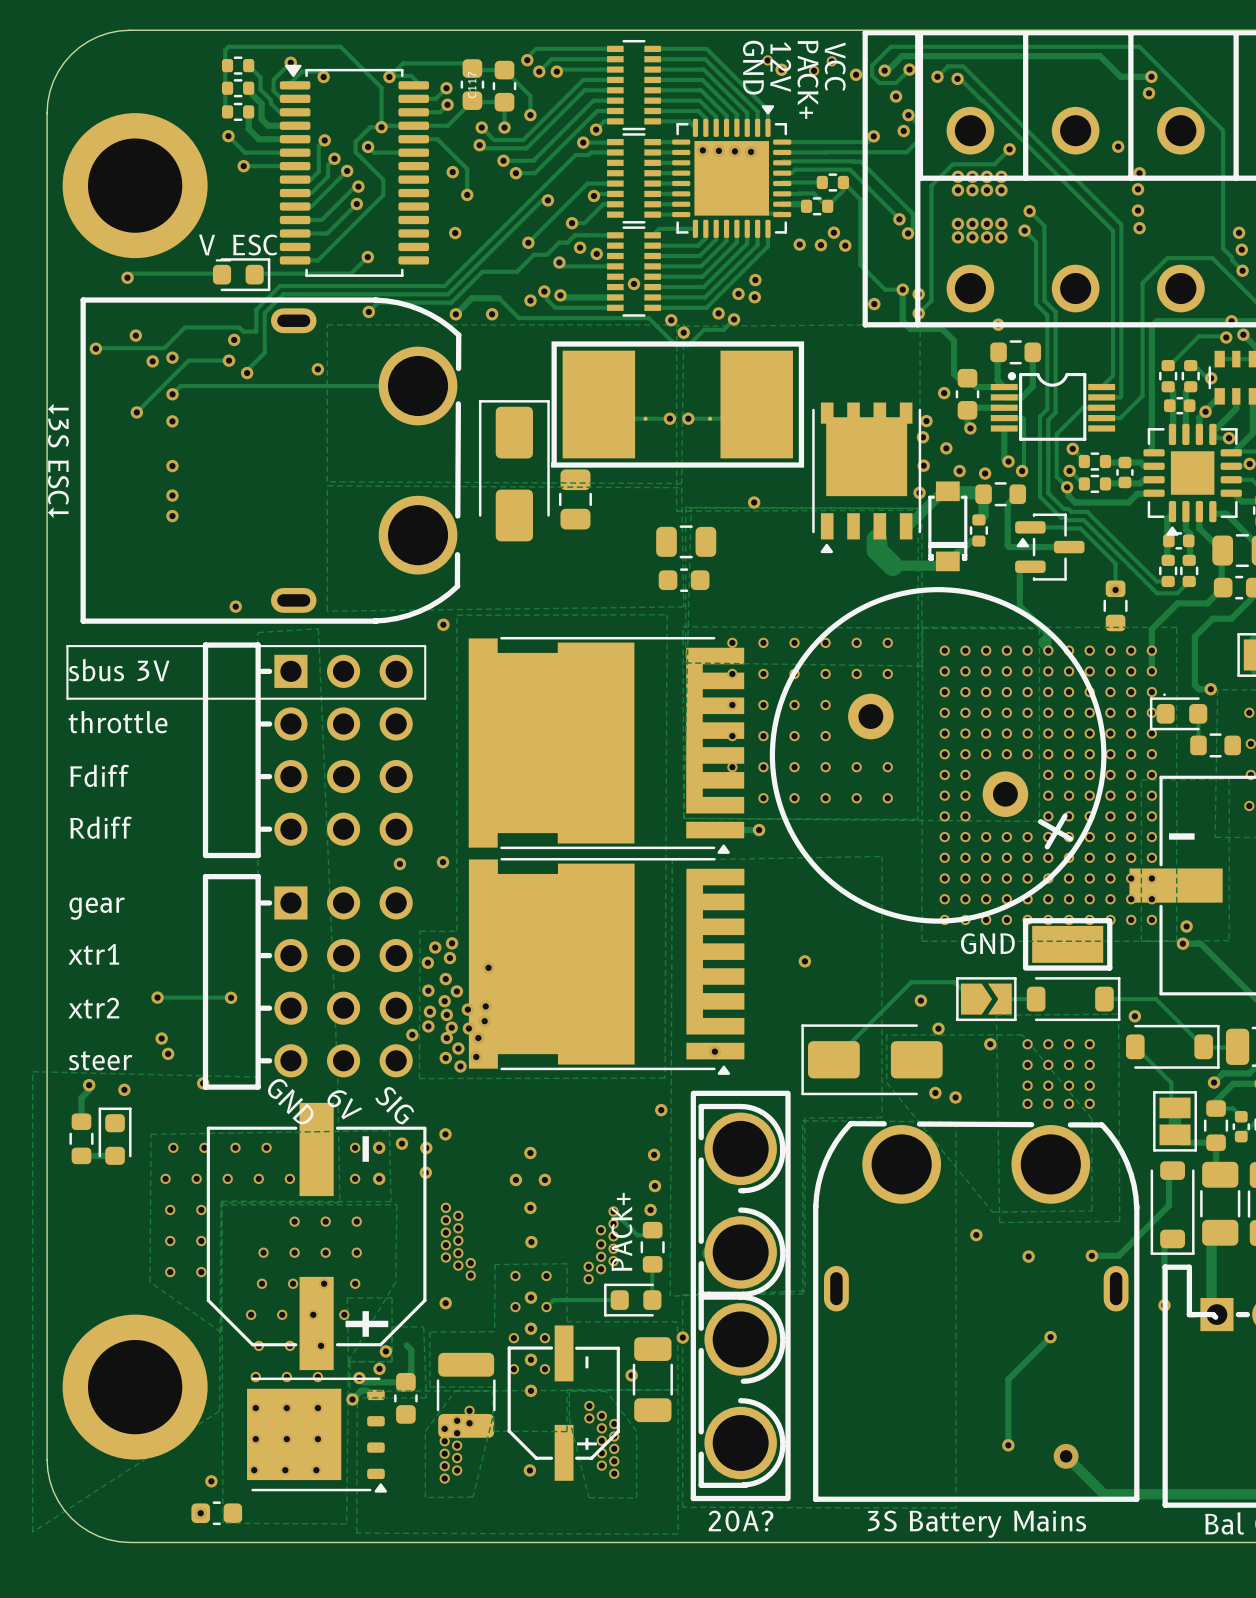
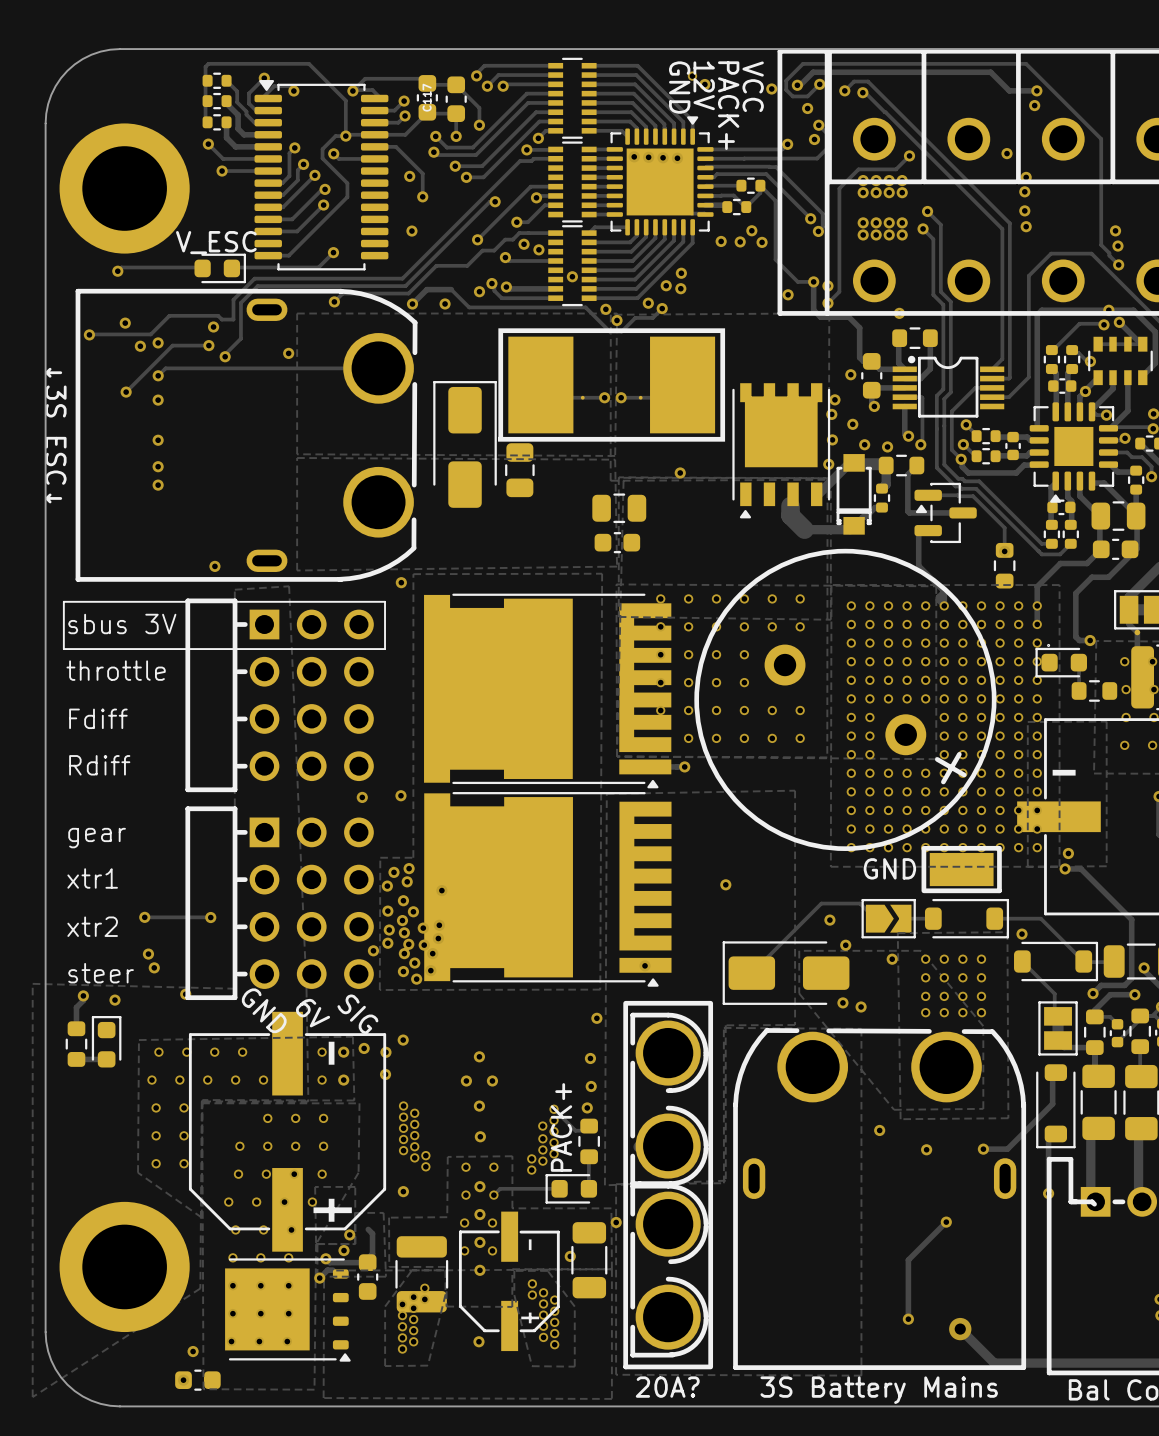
via: (831, 61) -> none
via: (814, 70) -> none

